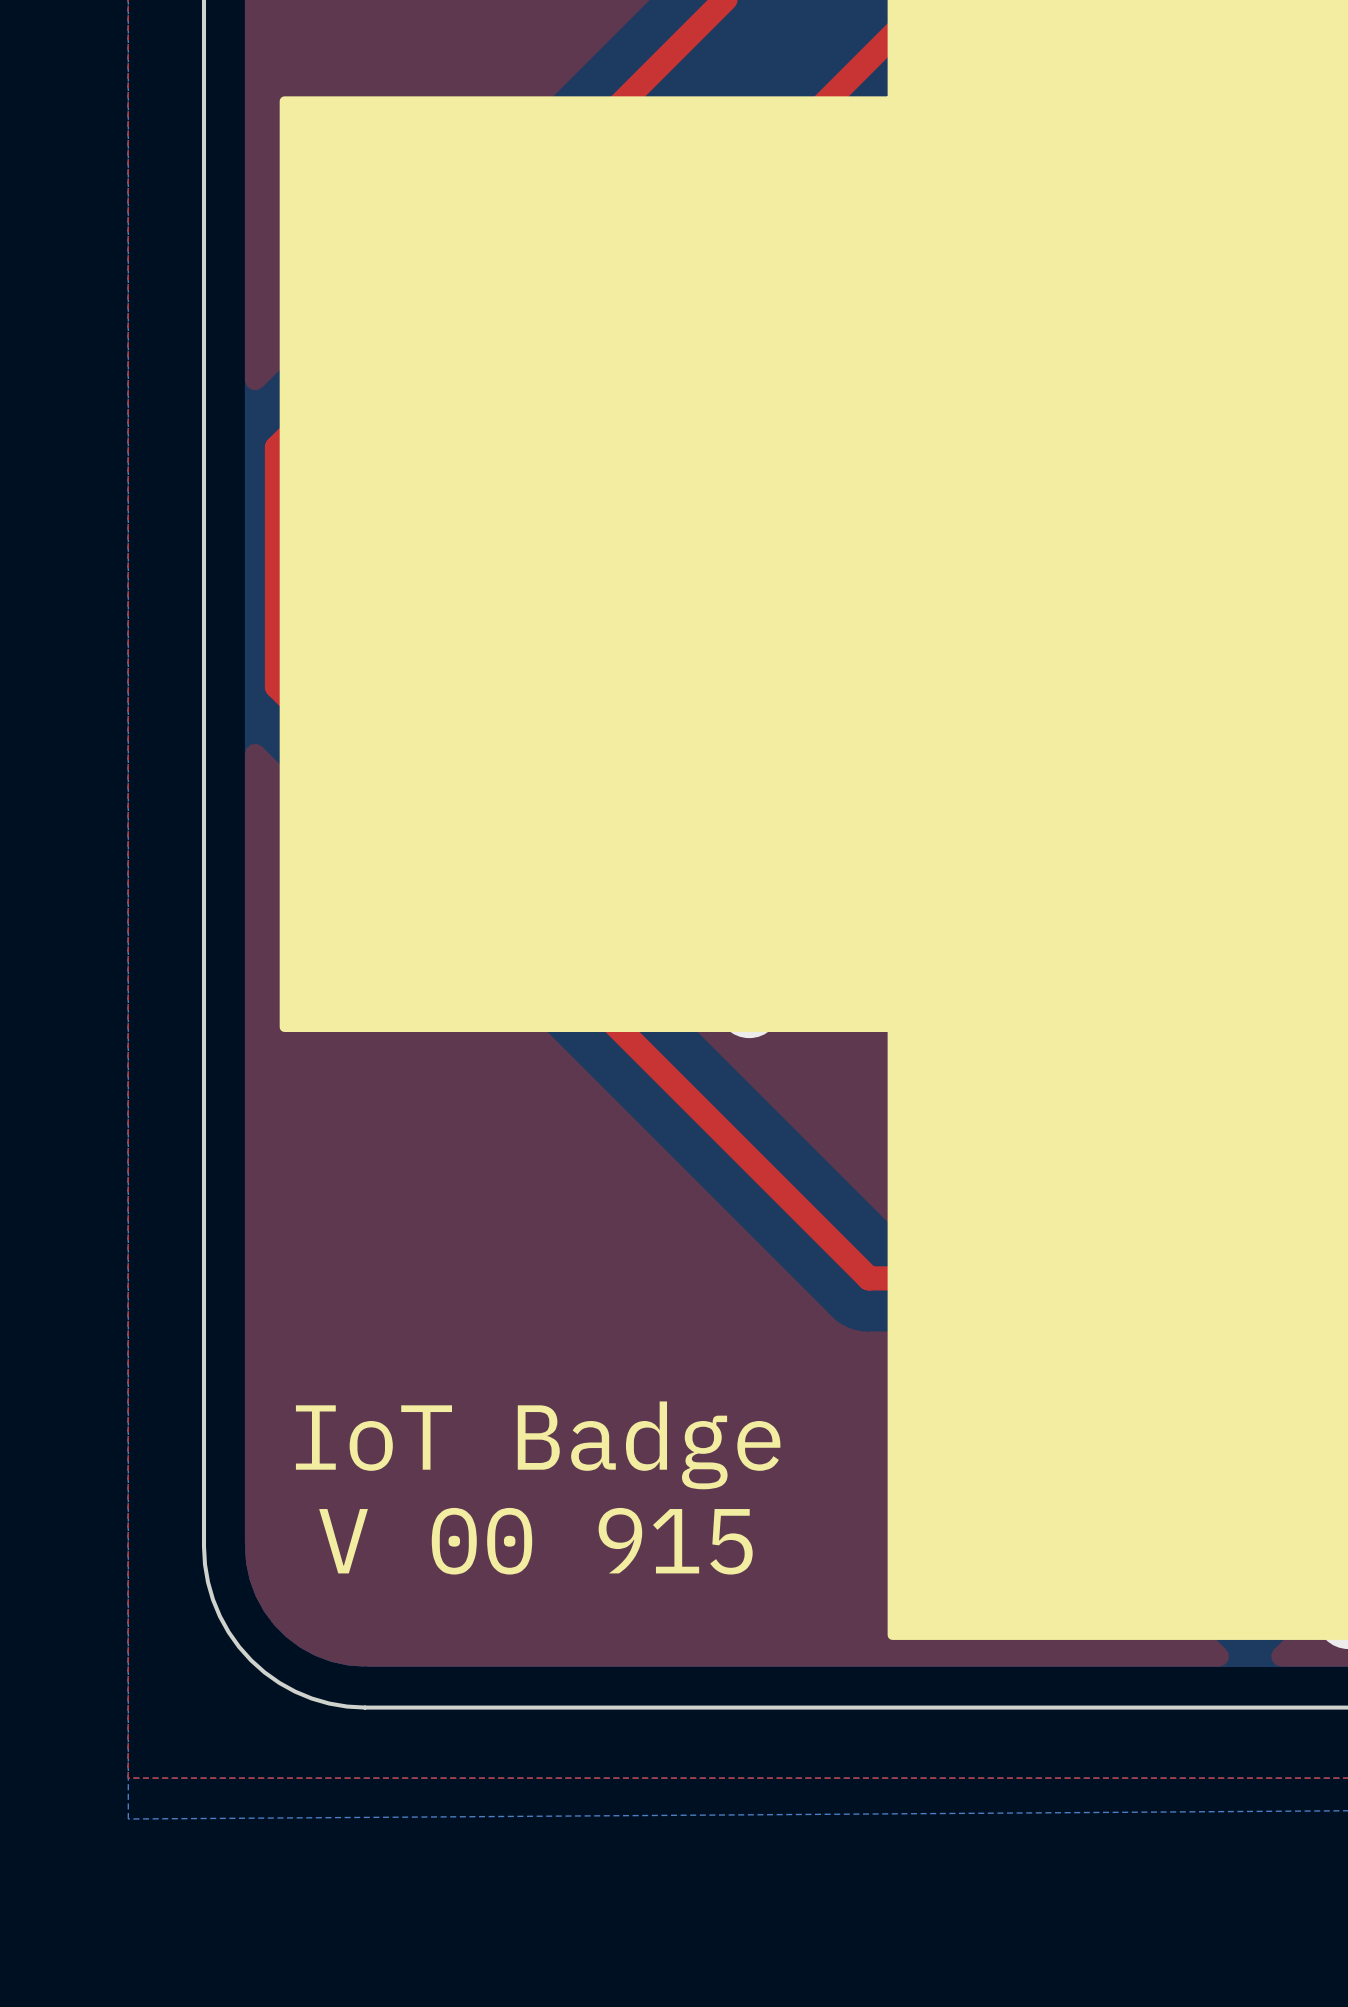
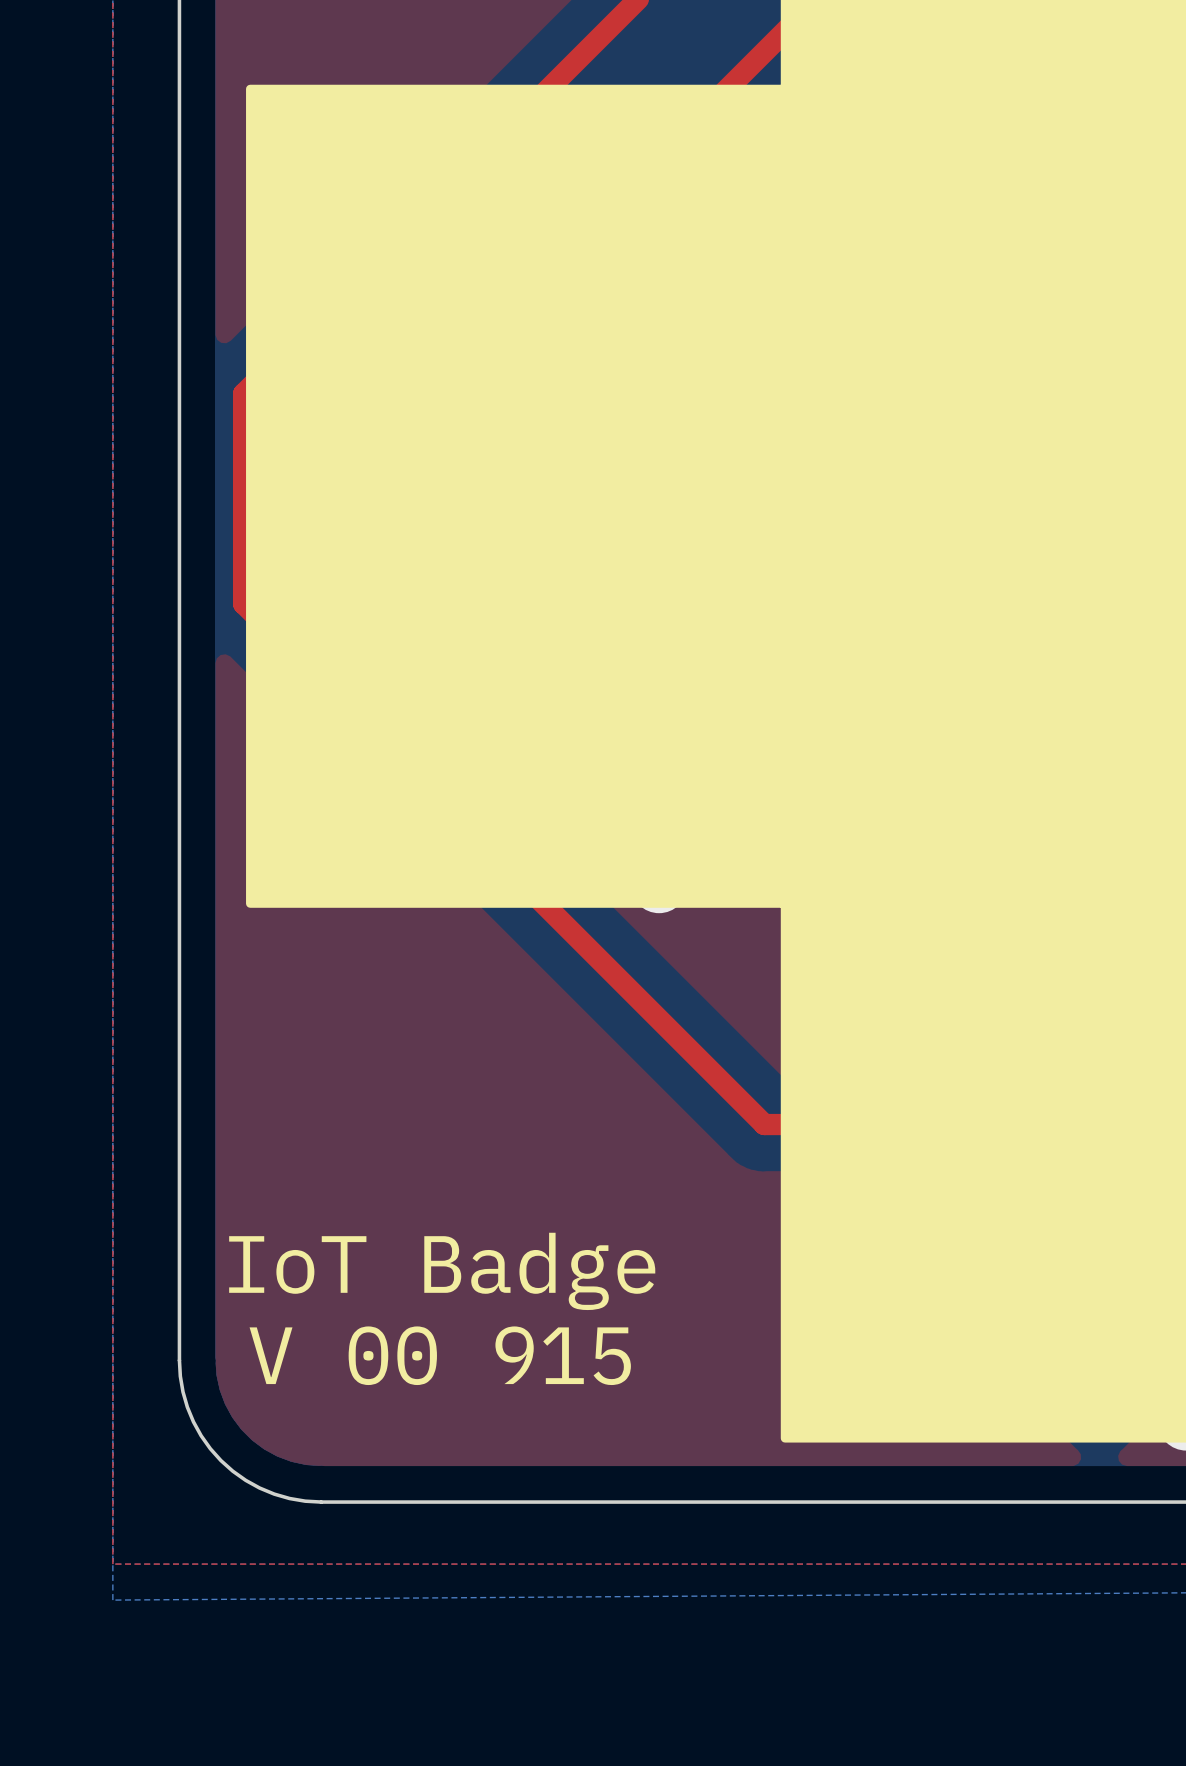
text position: IoT Badge (538, 1445) -> IoT Badge (442, 1271)
text position: V 00 915 (535, 1541) -> V 00 915 (440, 1355)

